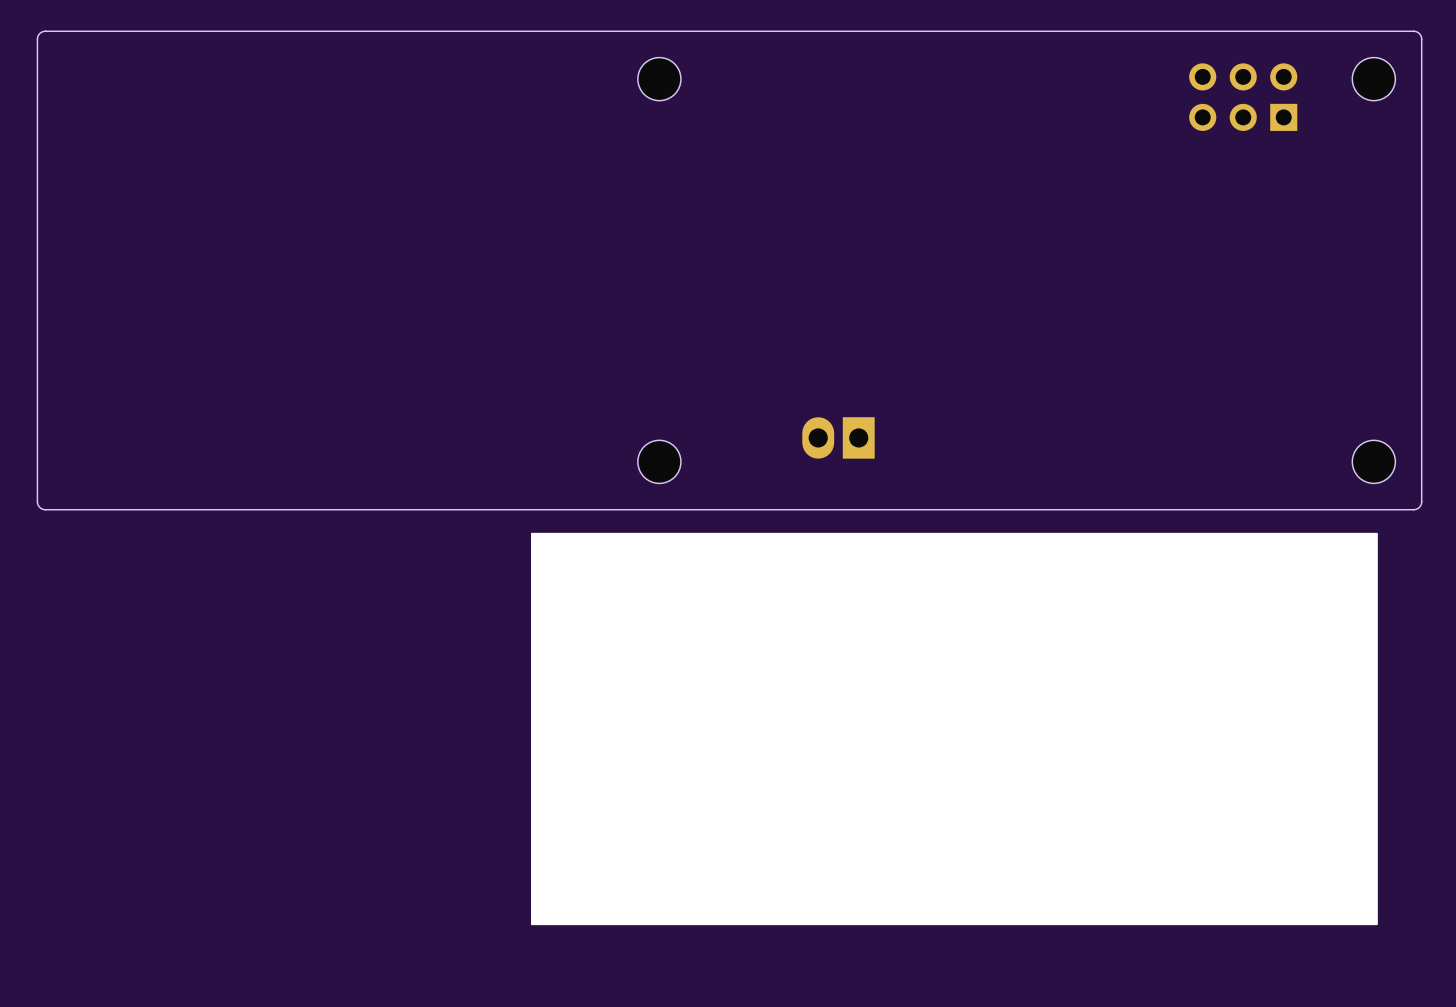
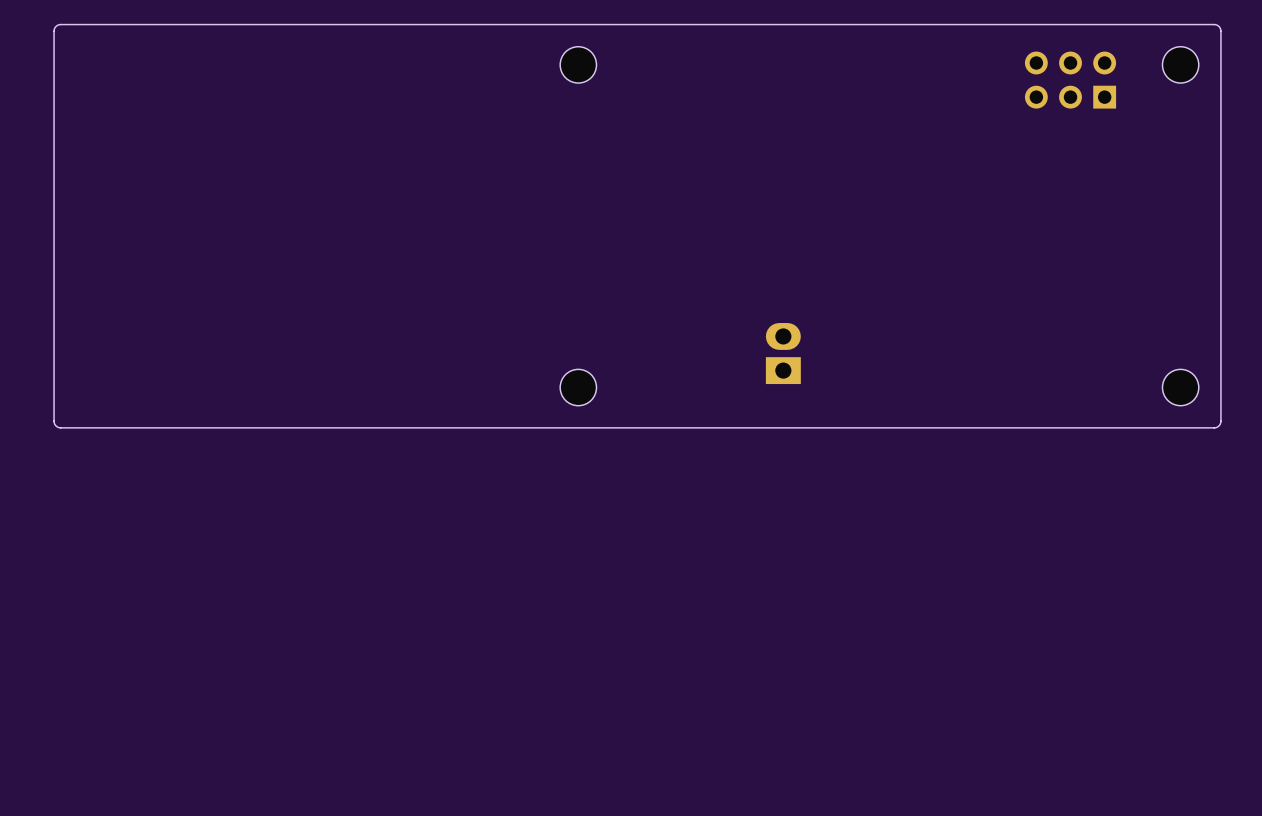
part rotation: 0° (838, 437) -> 90° clockwise (783, 353)
part position: (838, 437) -> (783, 353)
drawing: [531, 532, 1378, 926] -> none

